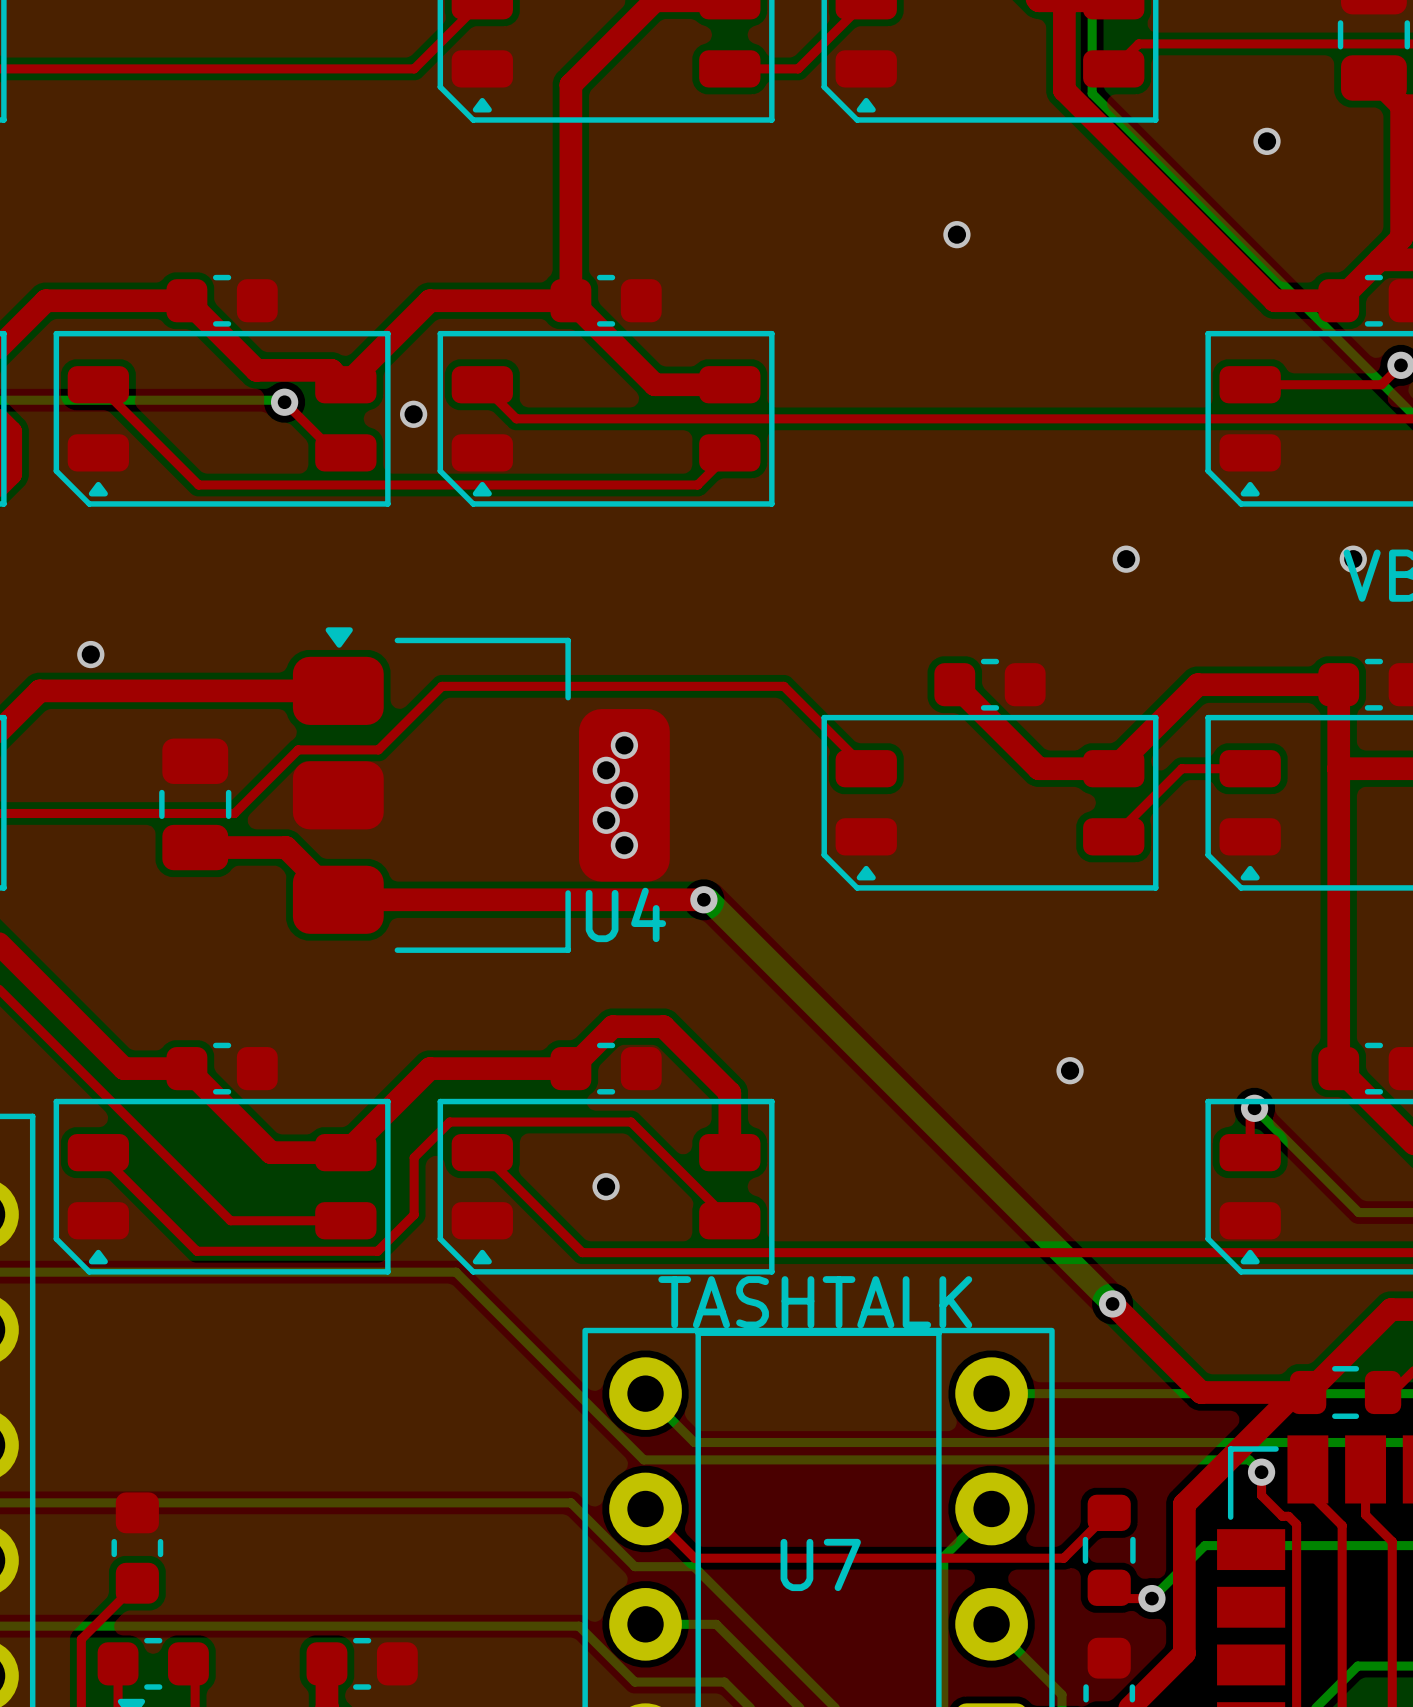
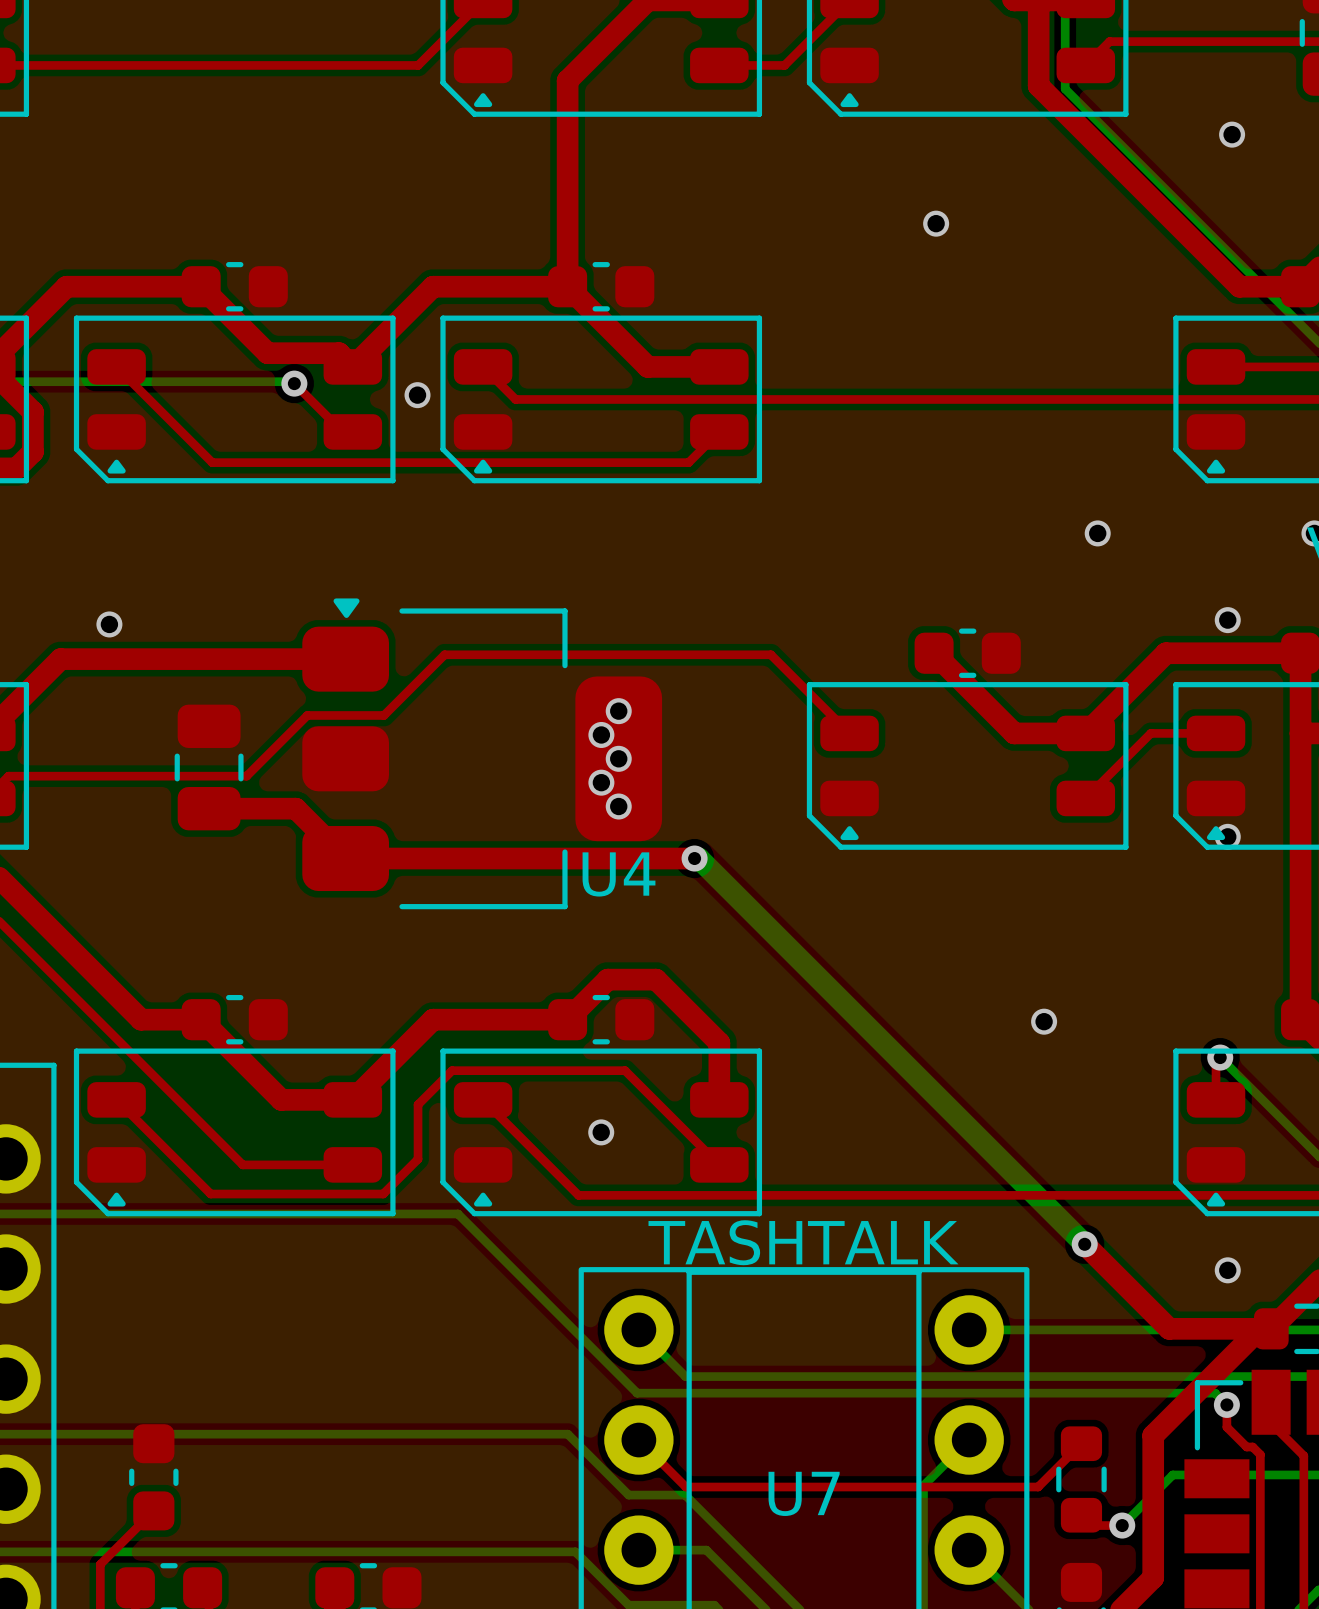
via: none -> (1227, 620)
via: none -> (1227, 836)
via: none -> (1227, 1270)

